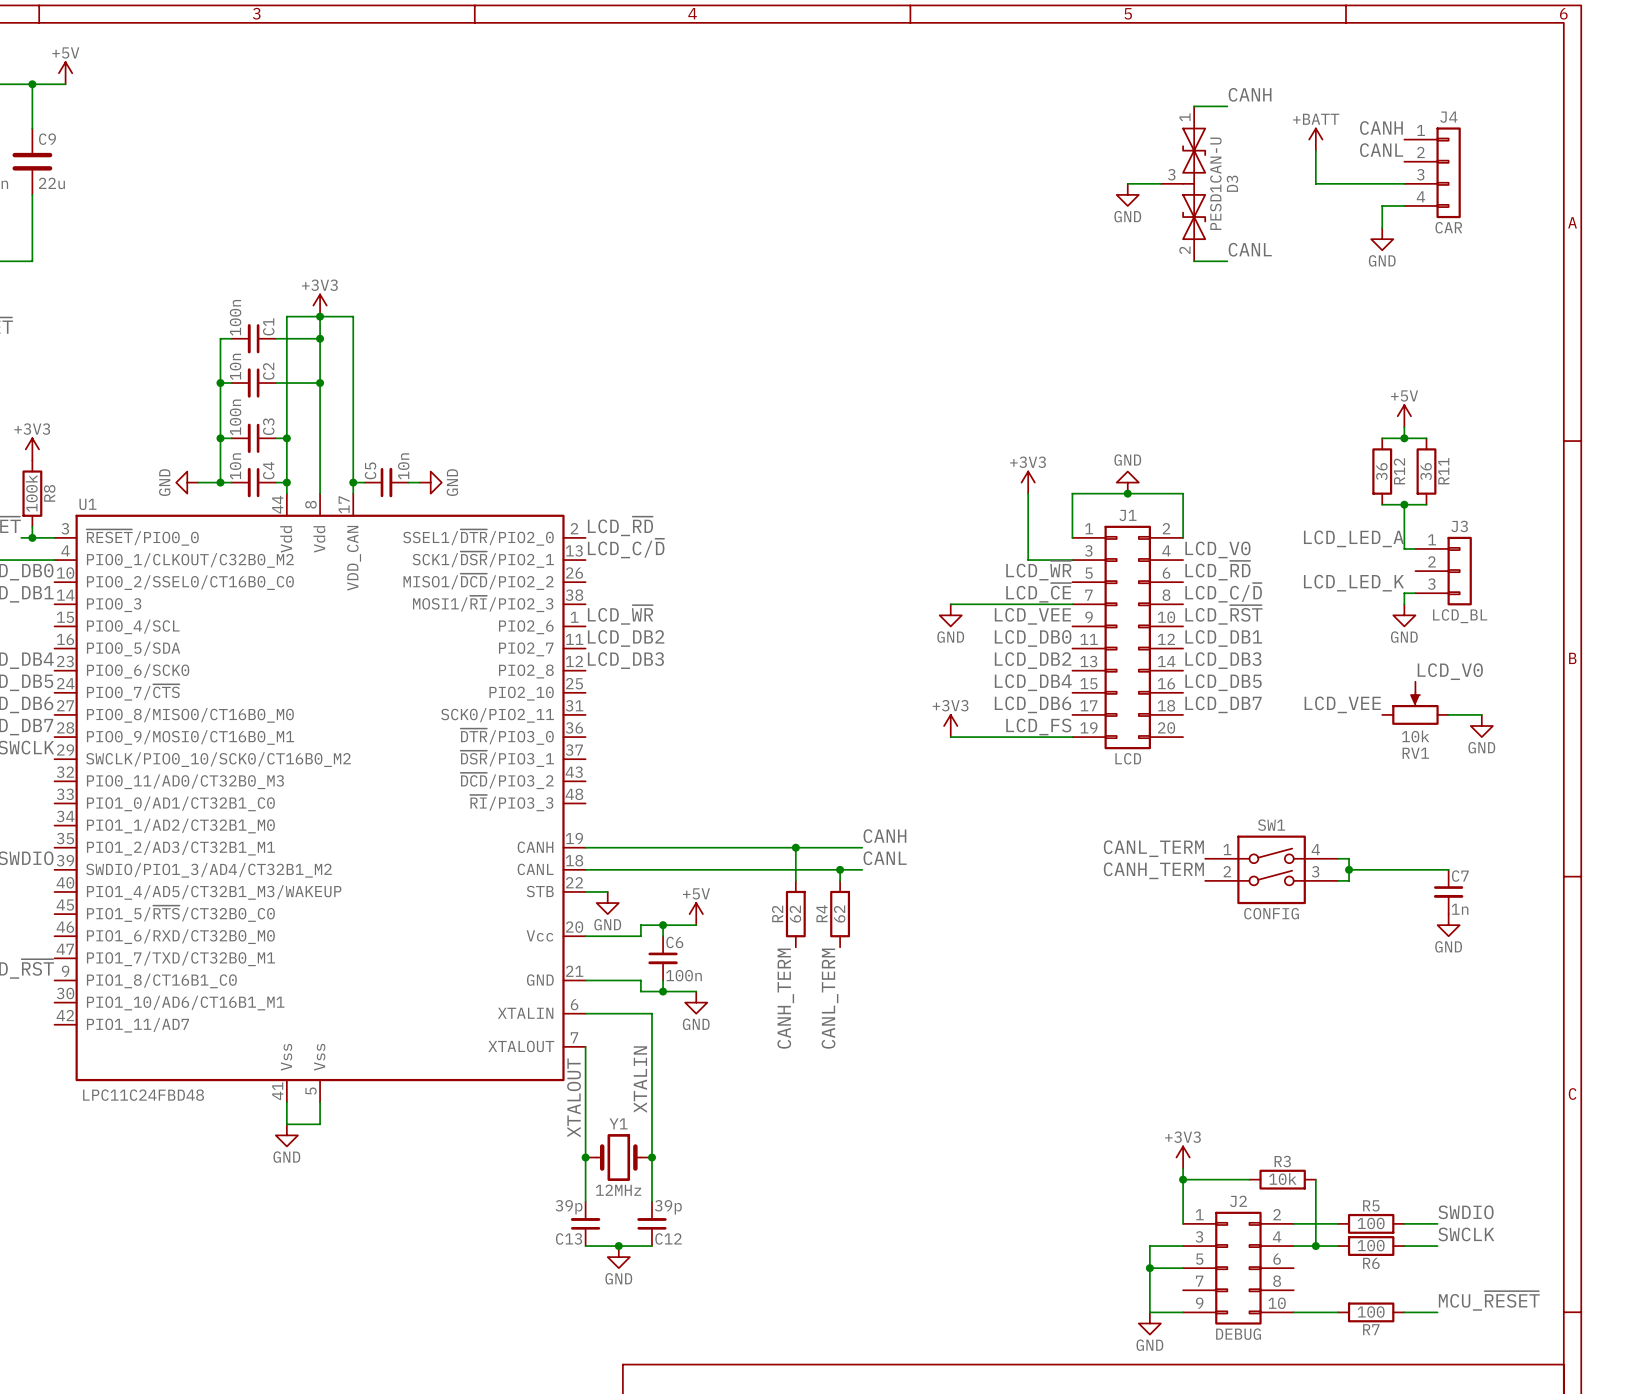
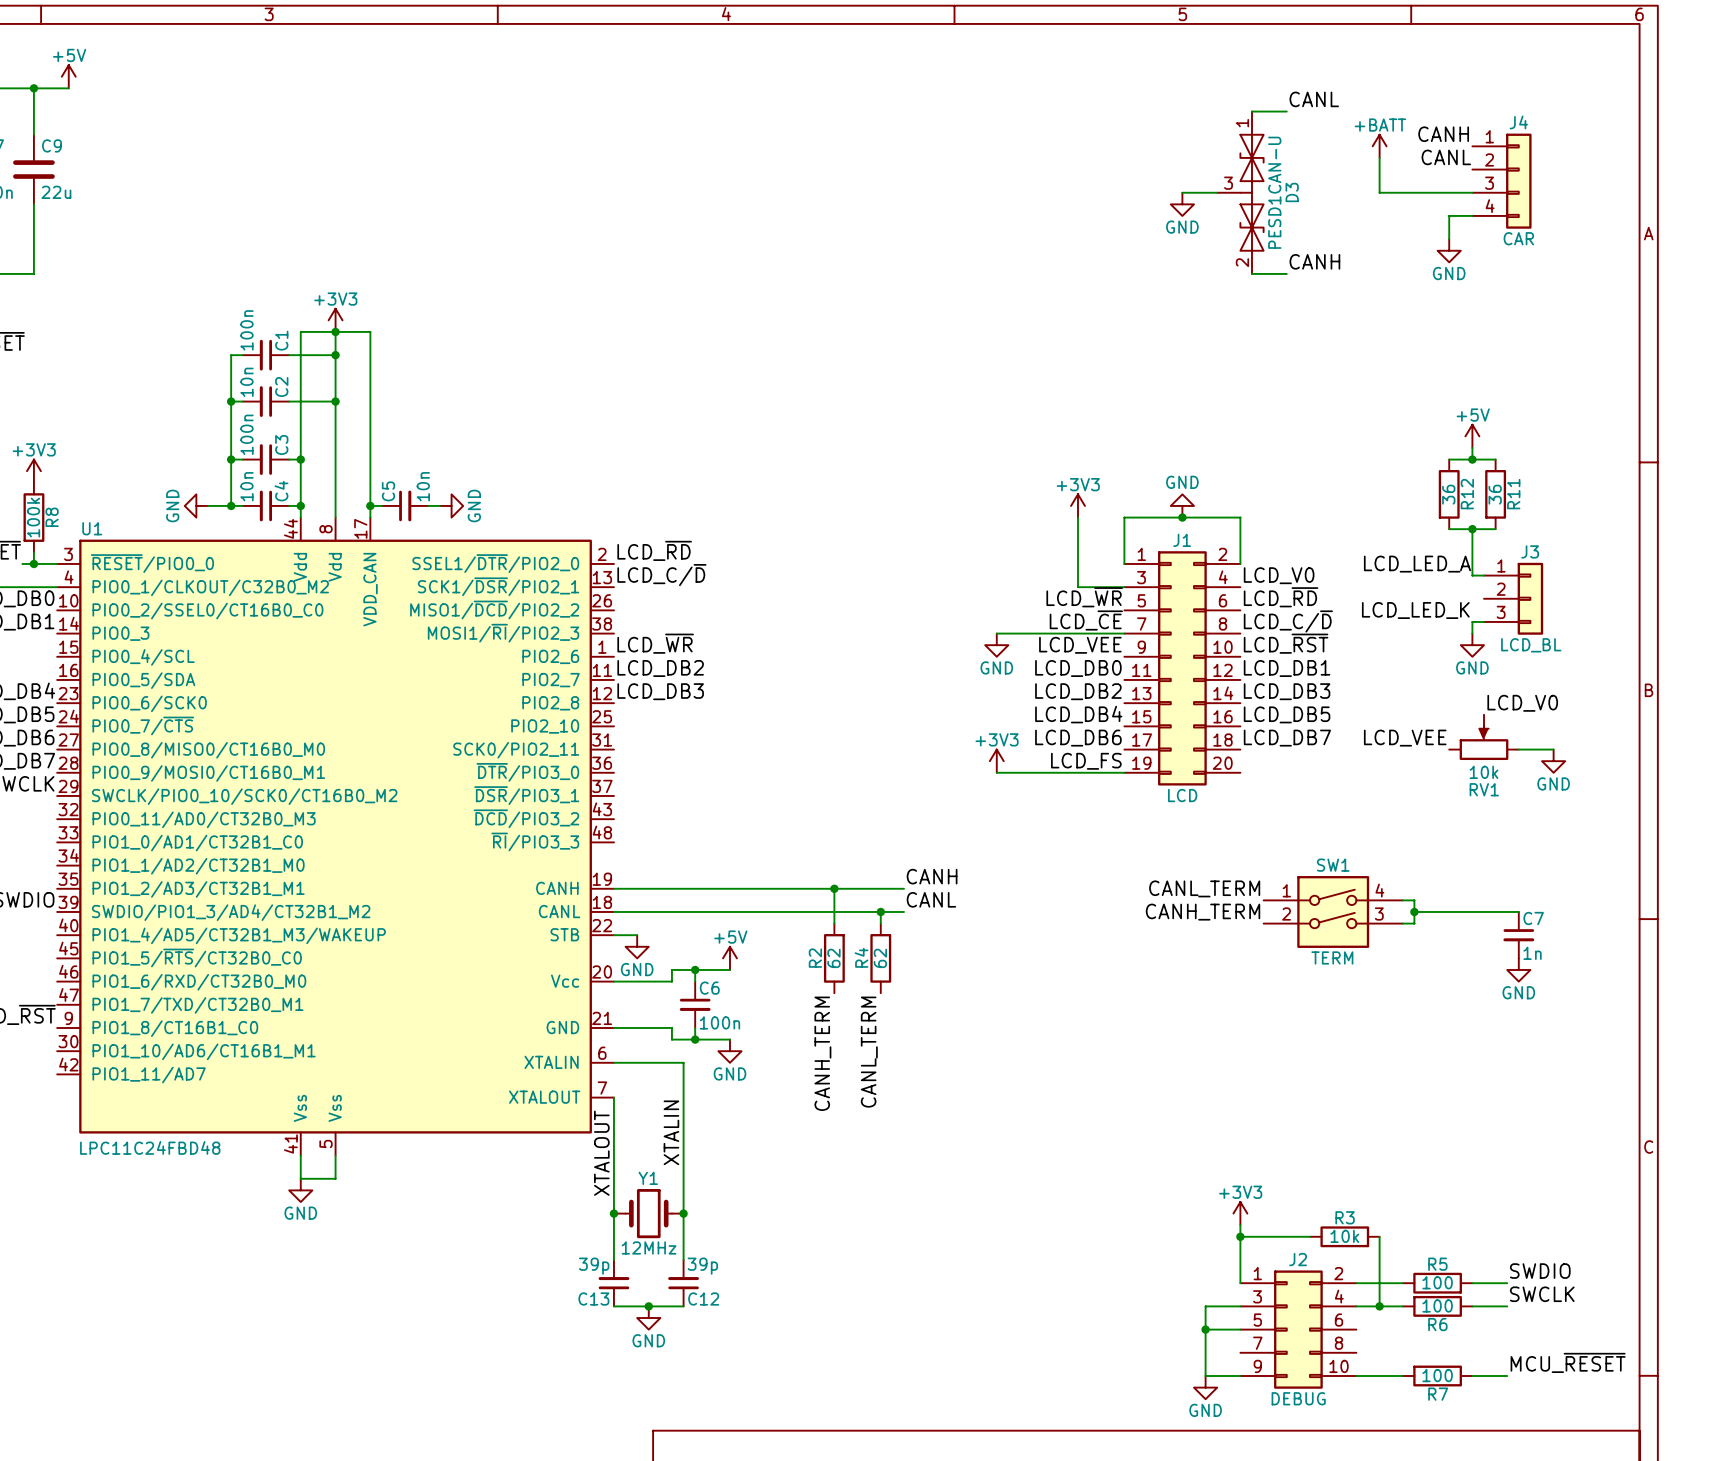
label: CANH (1250, 94) -> CANL (1314, 99)
label: CANL (1250, 249) -> CANH (1314, 261)
SW1 value: CONFIG (1271, 913) -> TERM (1332, 957)

